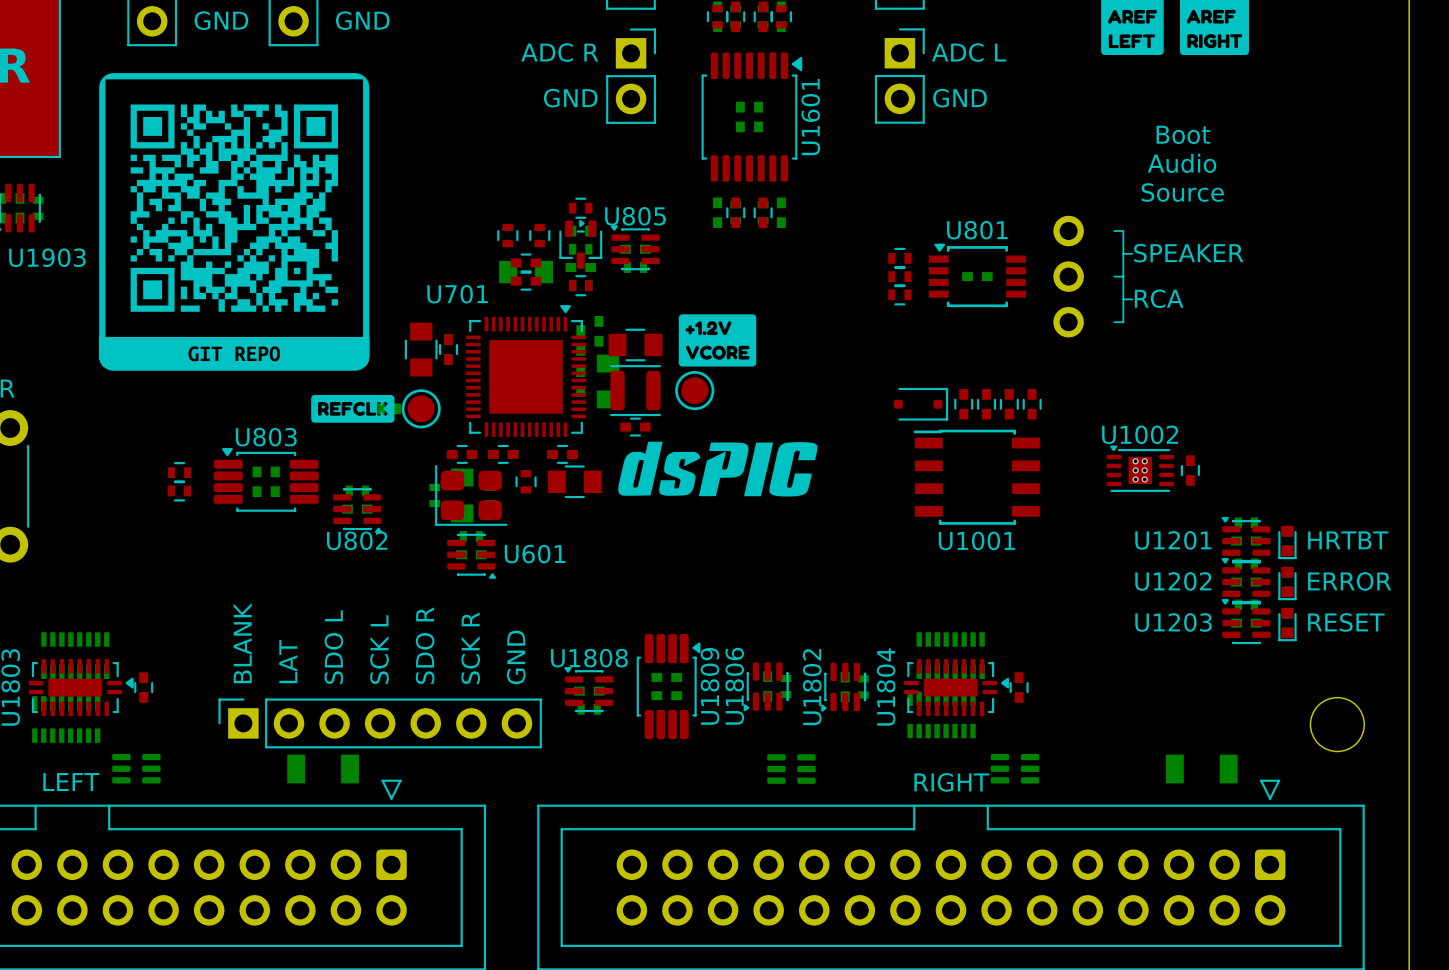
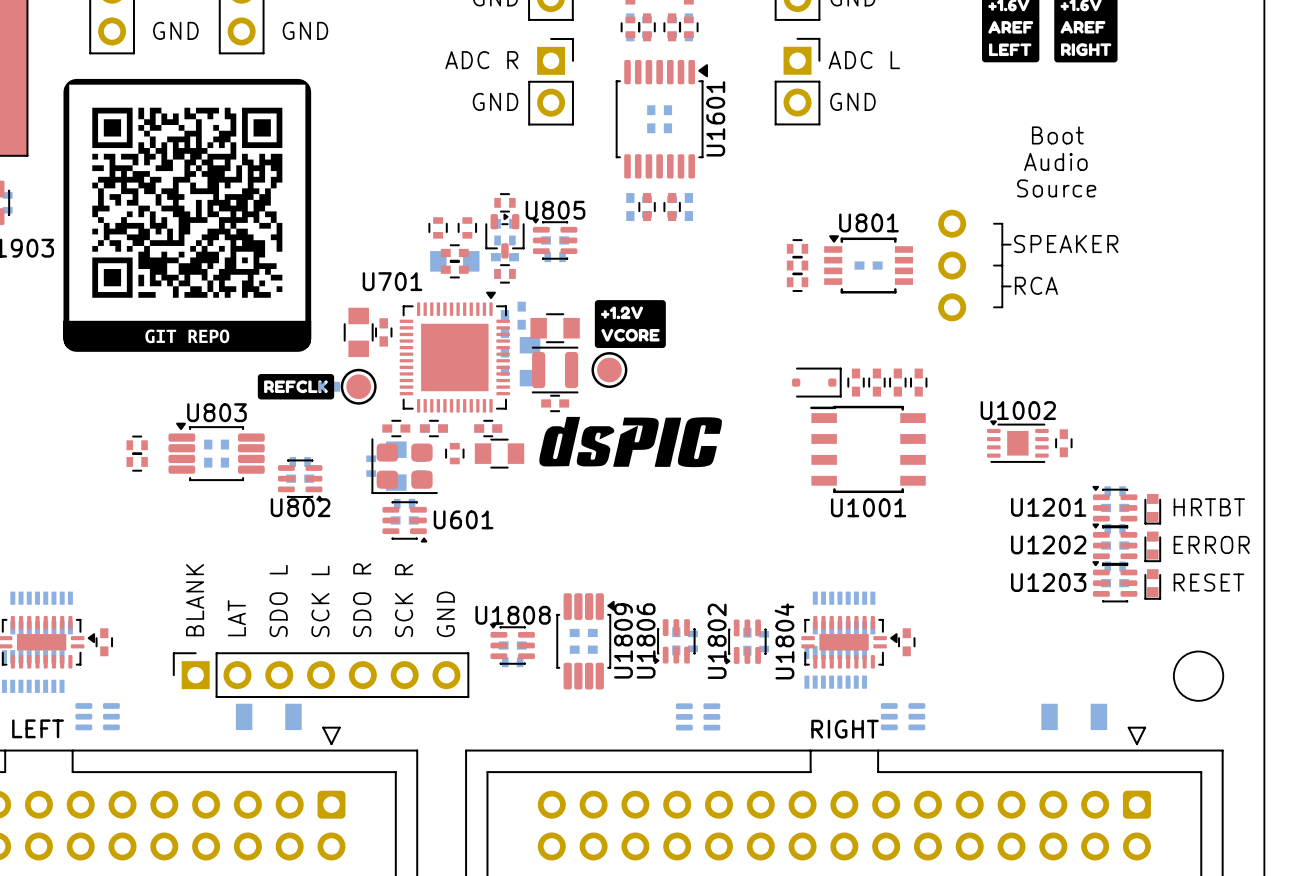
via: (1135, 461) -> none
via: (1144, 461) -> none
via: (1135, 470) -> none
via: (1144, 470) -> none
via: (1135, 479) -> none
via: (1144, 479) -> none

